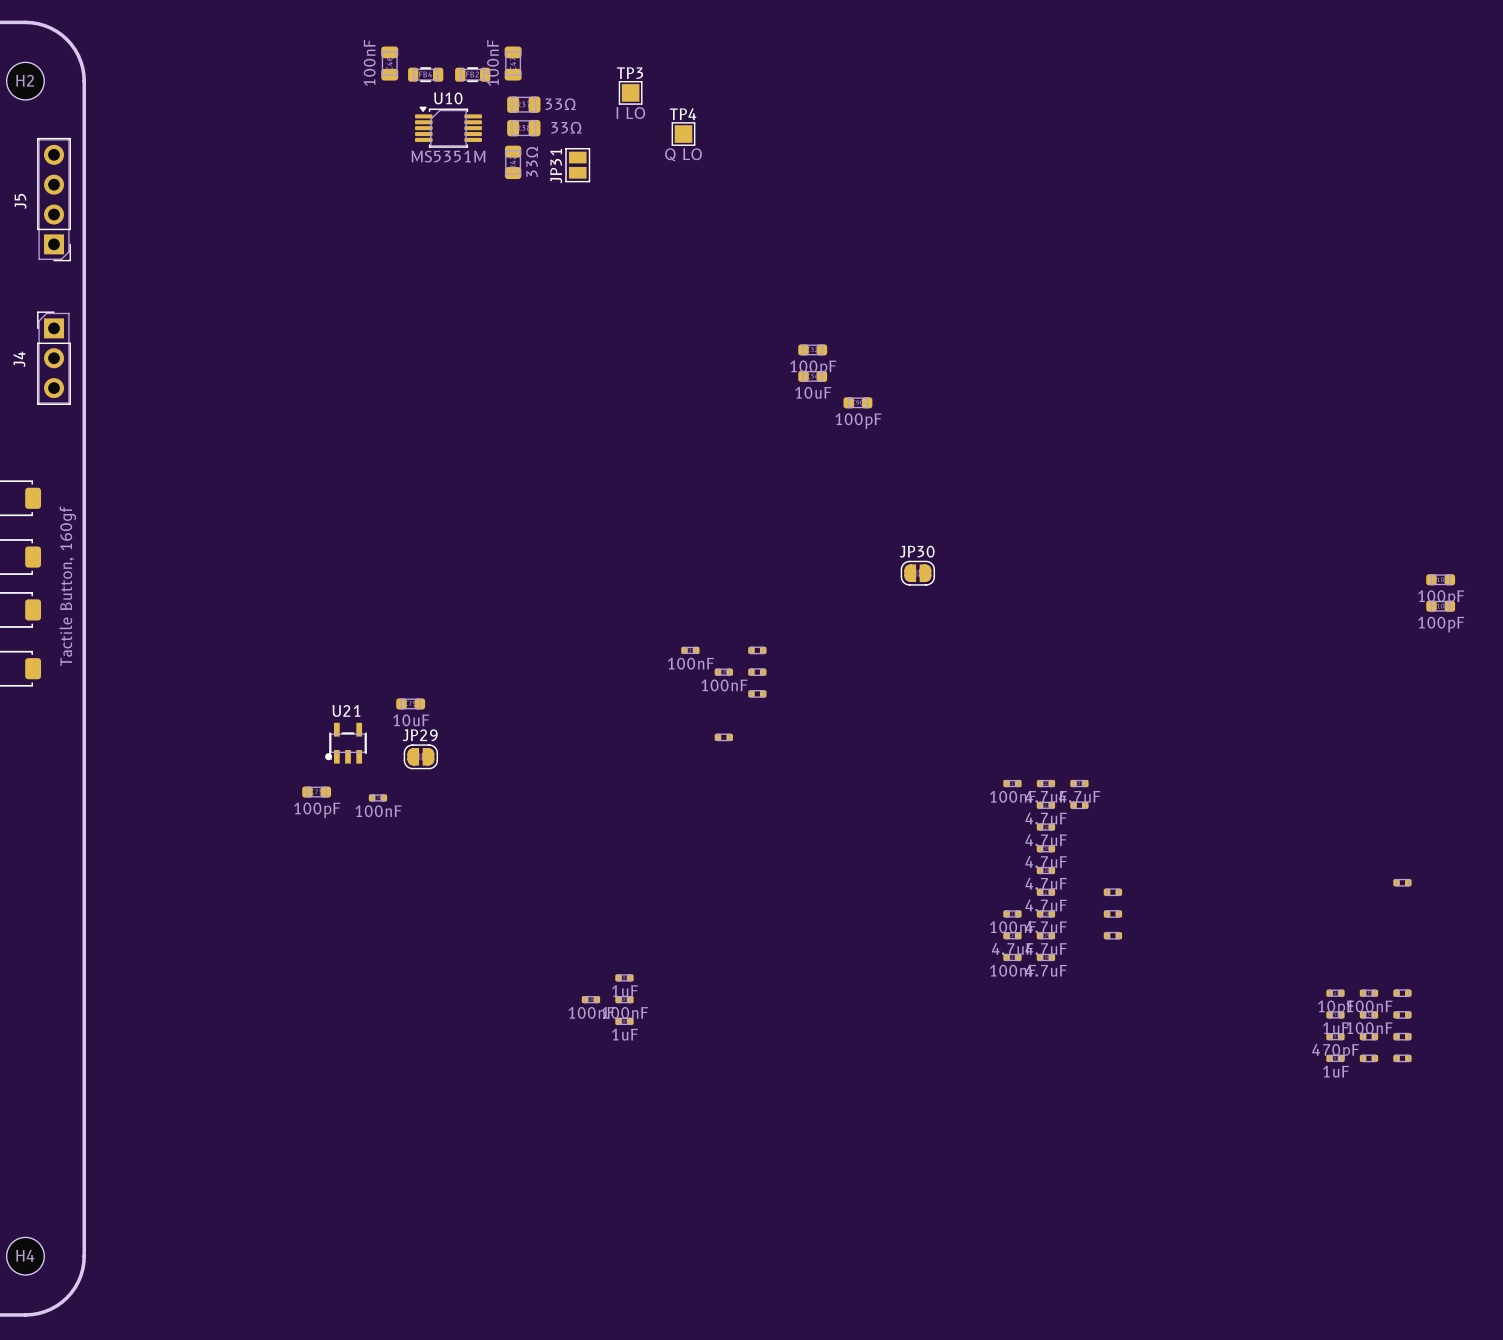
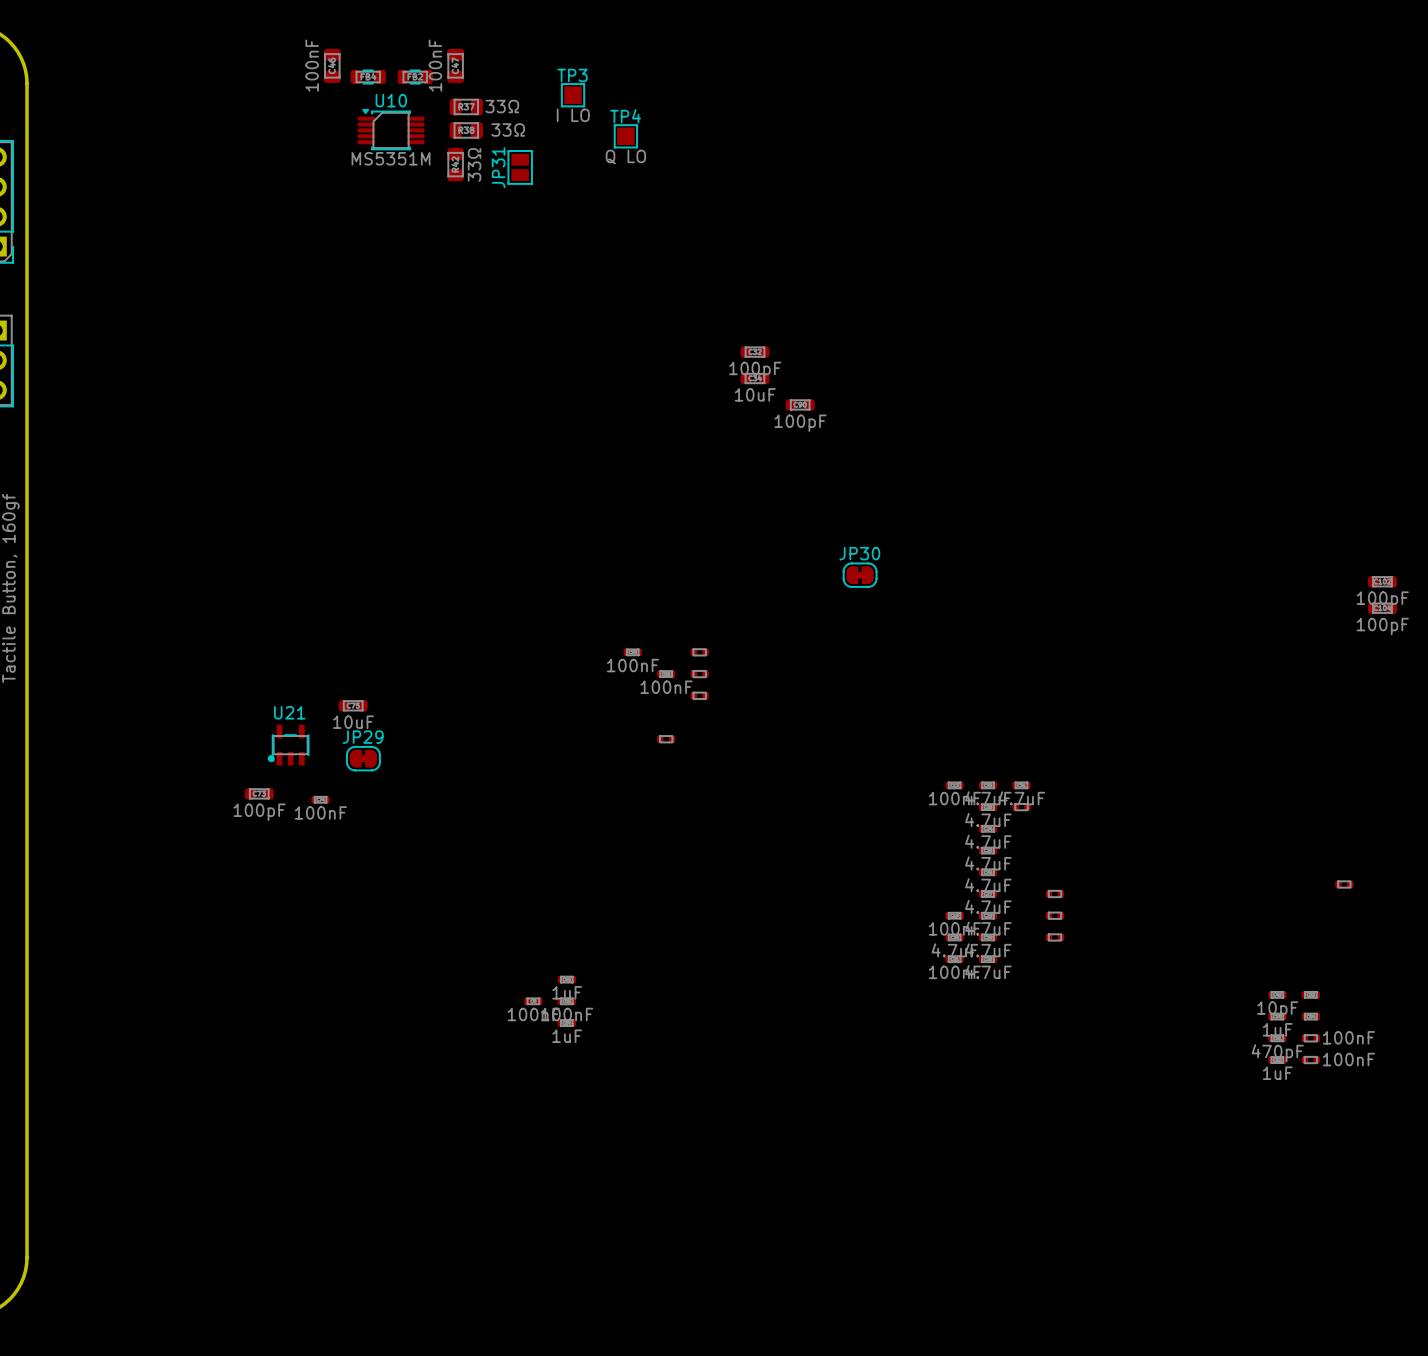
part: (1402, 993) -> none
part value position: 100nF (1369, 1006) -> 100nF (1348, 1037)
part: (1402, 1014) -> none
part value position: 100nF (1369, 1028) -> 100nF (1348, 1059)
part: (1402, 1036) -> none
part: (1402, 1058) -> none

